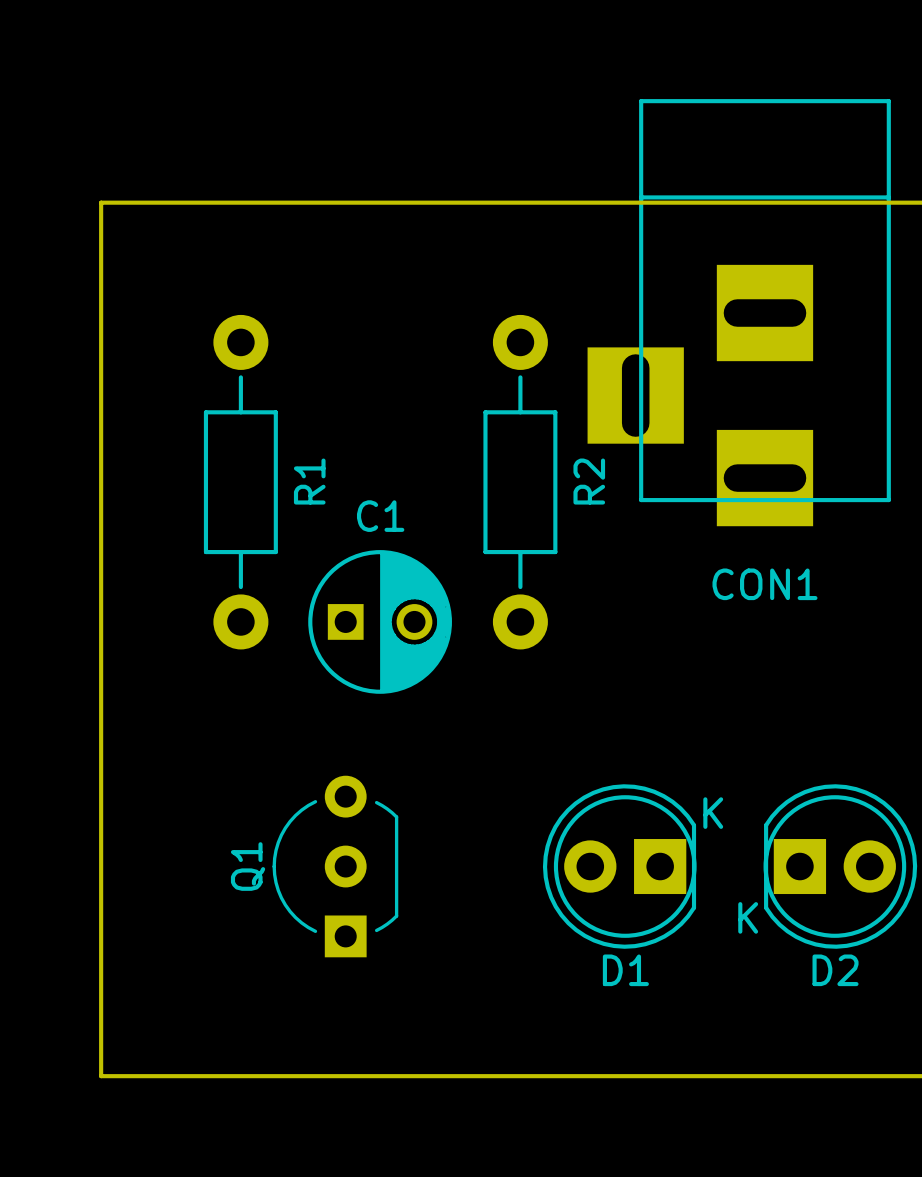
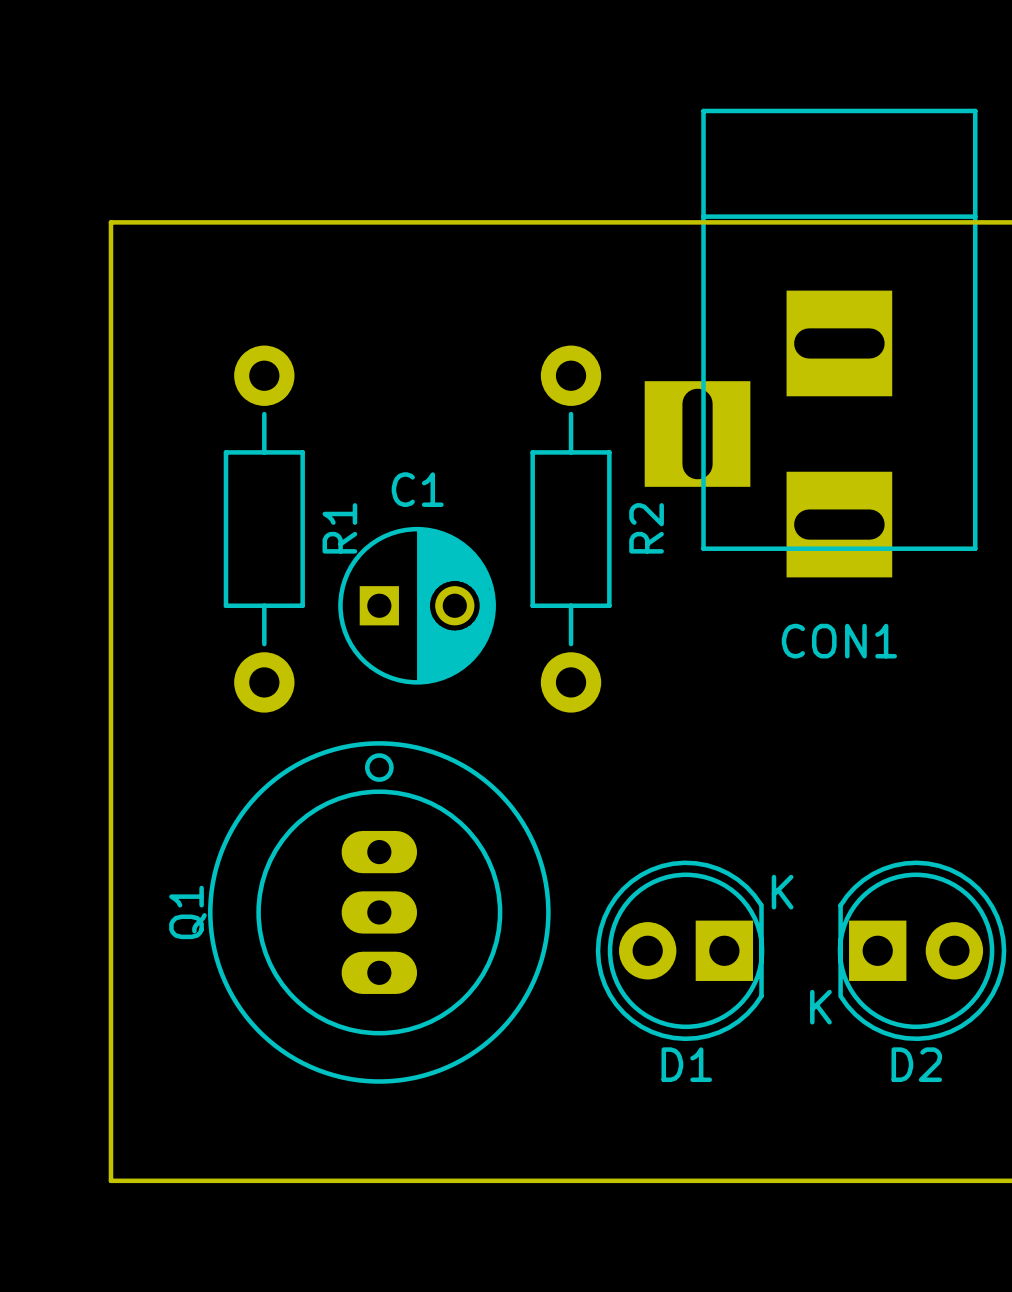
C1 position: (380, 621) -> (417, 605)
Q1 footprint: [272, 775, 399, 958] -> [208, 741, 551, 1084]
Q1 name position: Q1 (248, 866) -> Q1 (187, 912)

